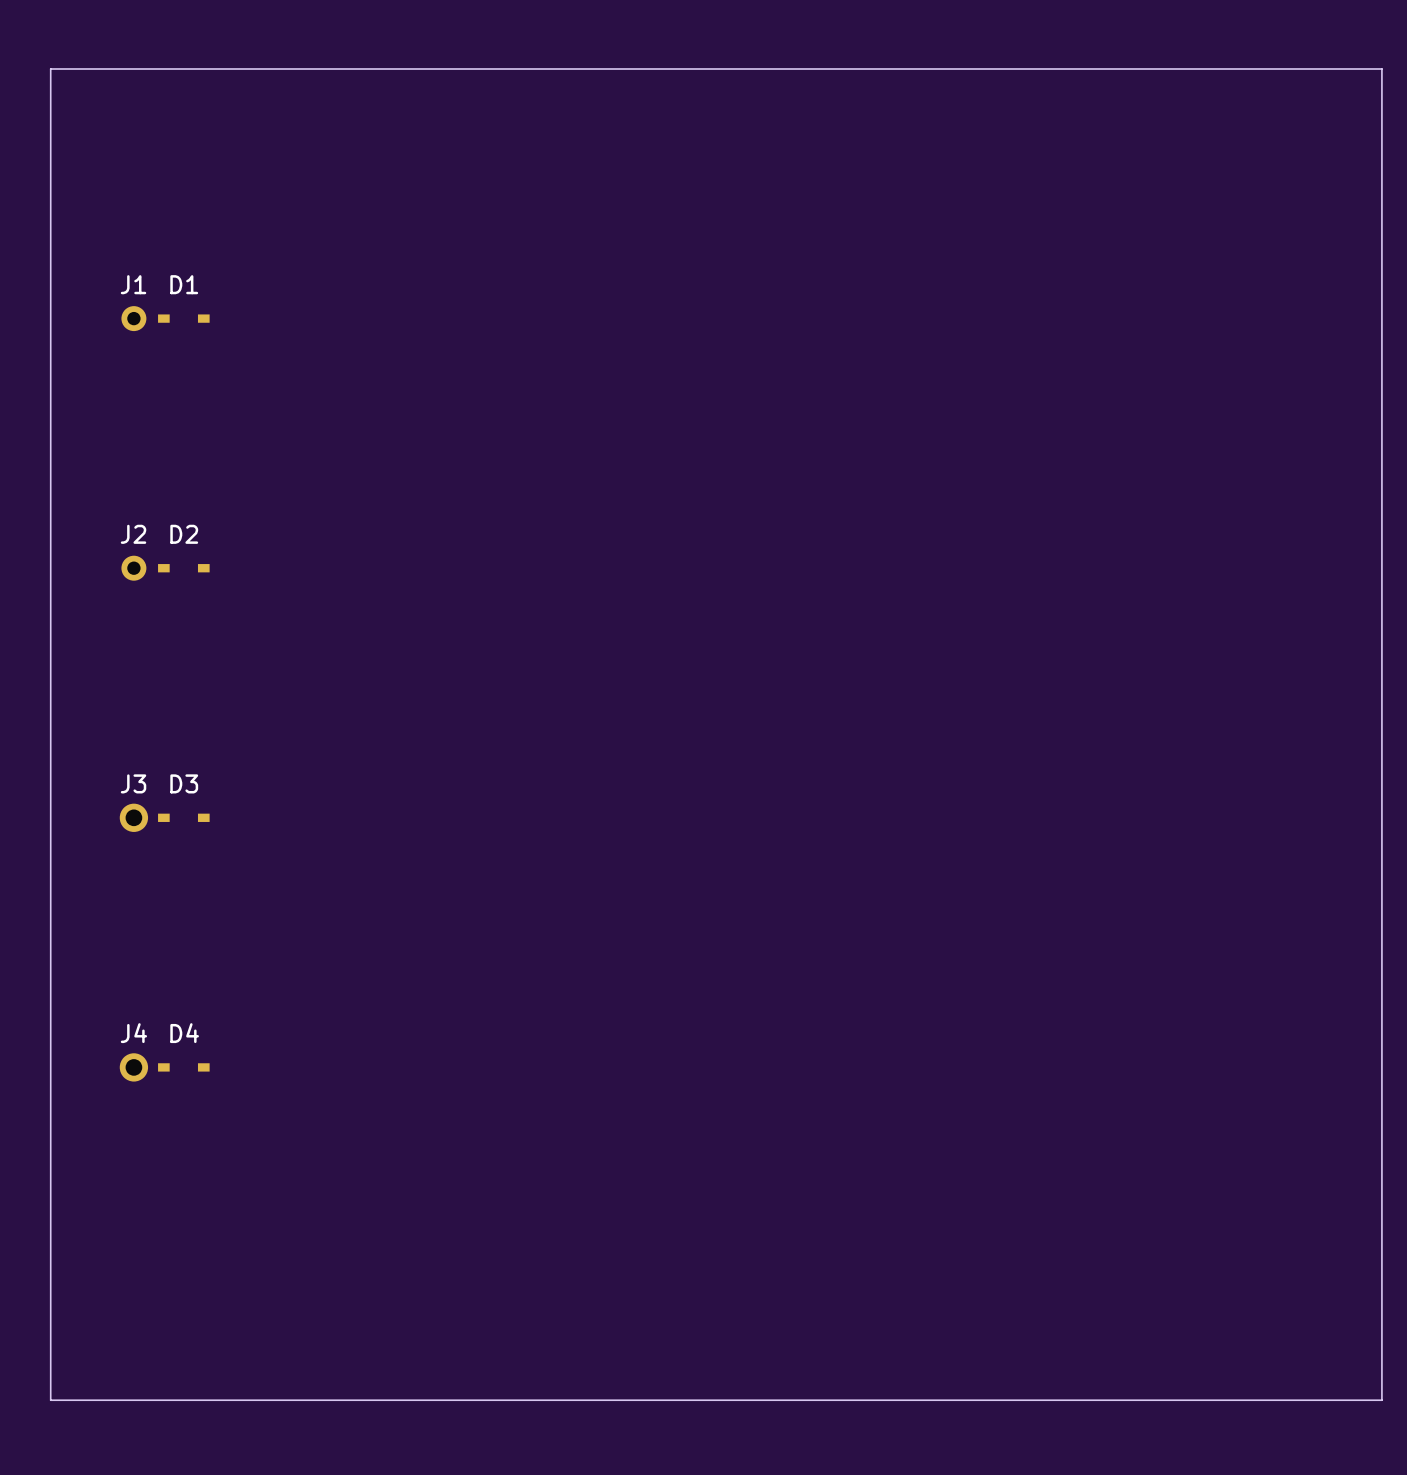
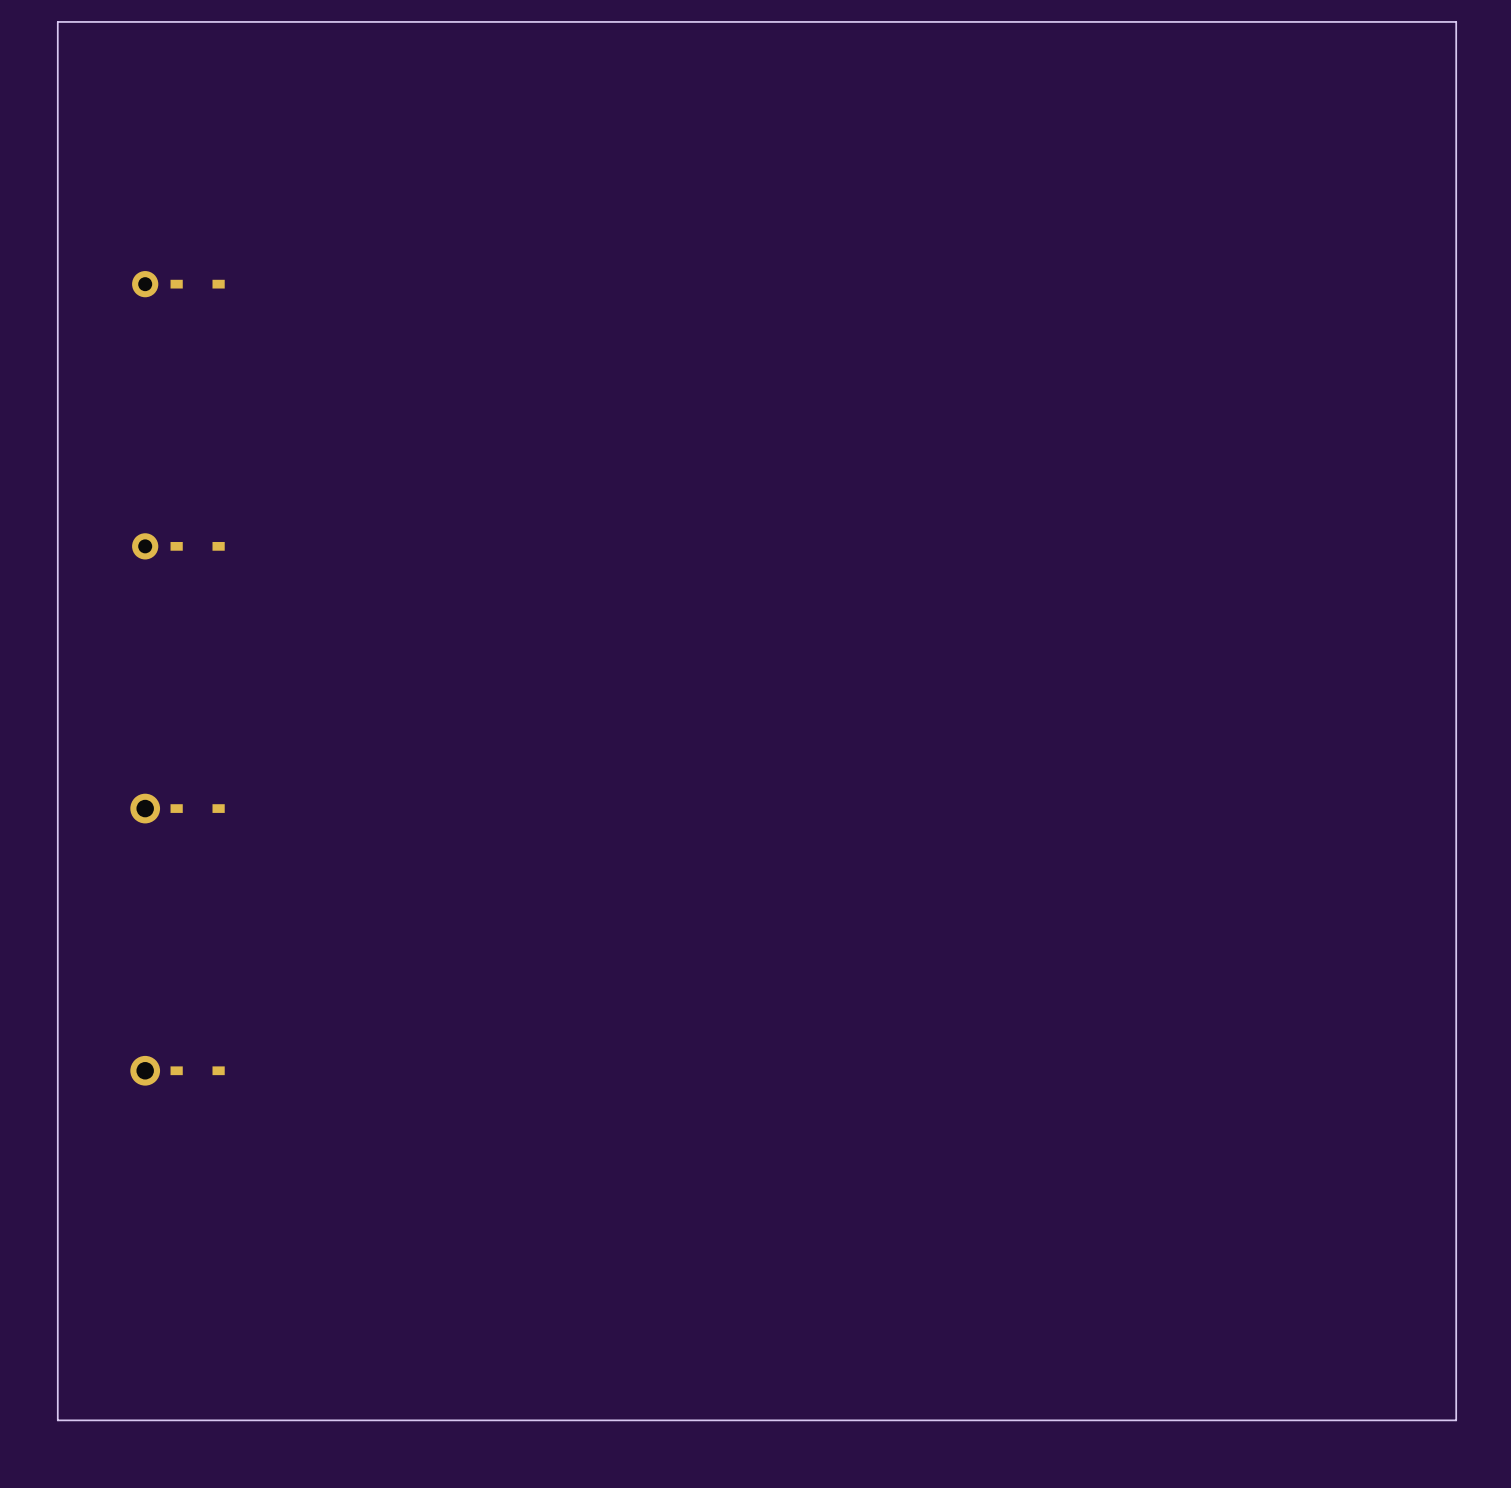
J1 name: J1 (133, 284) -> none
D1 name: D1 (184, 284) -> none
J2 name: J2 (133, 534) -> none
D2 name: D2 (184, 534) -> none
J3 name: J3 (133, 783) -> none
D3 name: D3 (184, 783) -> none
J4 name: J4 (133, 1033) -> none
D4 name: D4 (184, 1033) -> none

